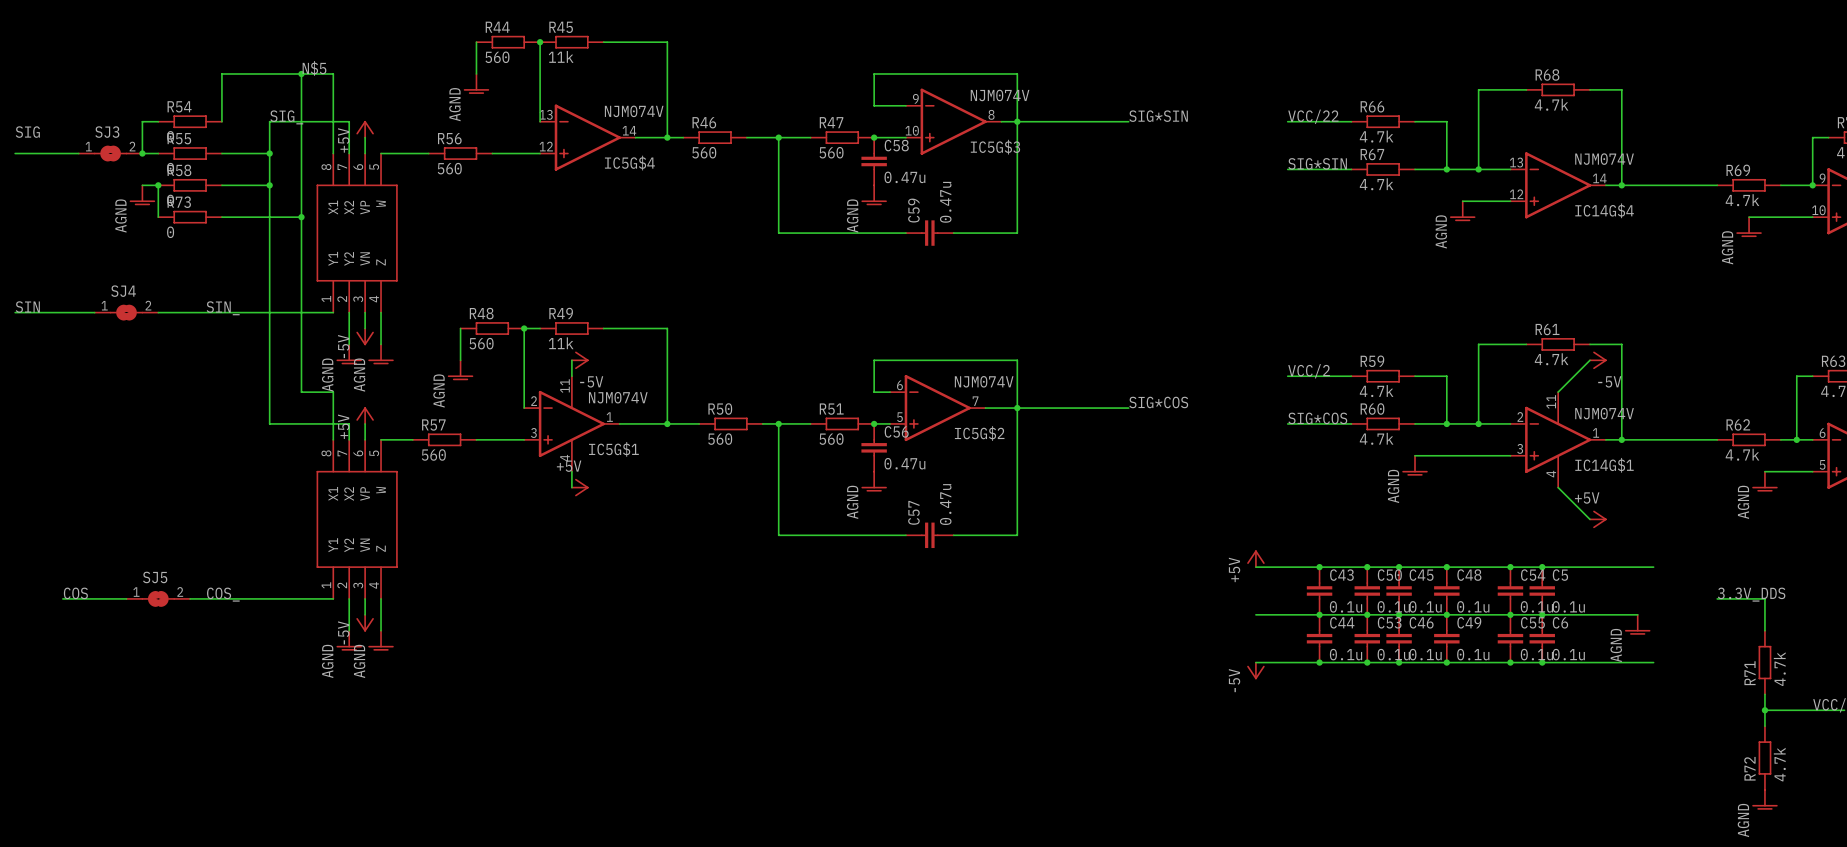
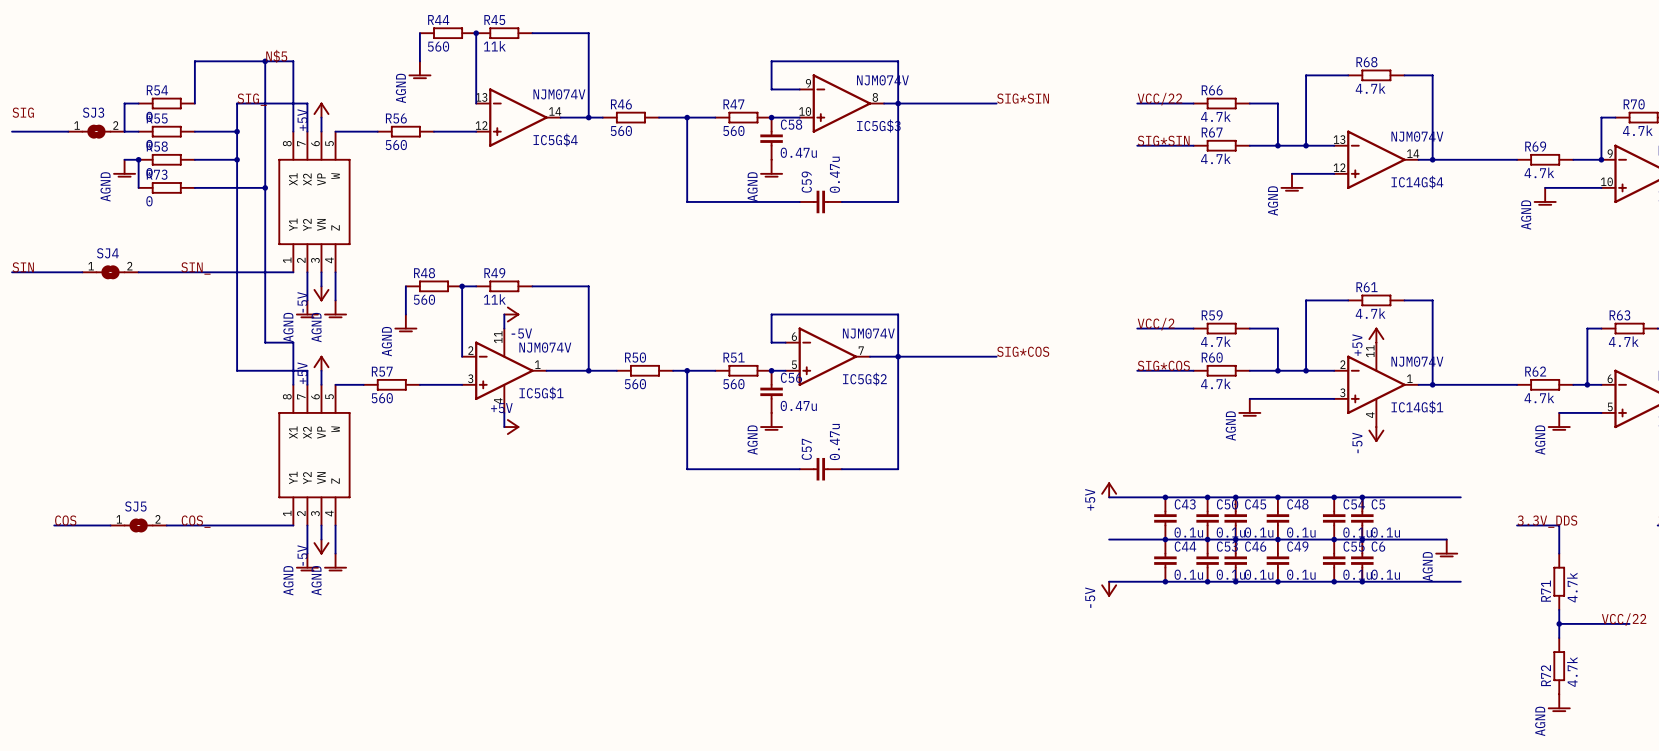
junction: (142, 153) -> none
wire: (1589, 360) (1558, 392) -> none
power symbol position: -5V (1598, 360) -> -5V (1376, 434)
power symbol rotation: 0° (1599, 360) -> 90° clockwise (1376, 435)
wire: (1558, 487) (1589, 519) -> none
power symbol position: +5V (1598, 519) -> +5V (1376, 335)
power symbol rotation: 0° (1599, 519) -> 90° counterclockwise (1376, 333)

